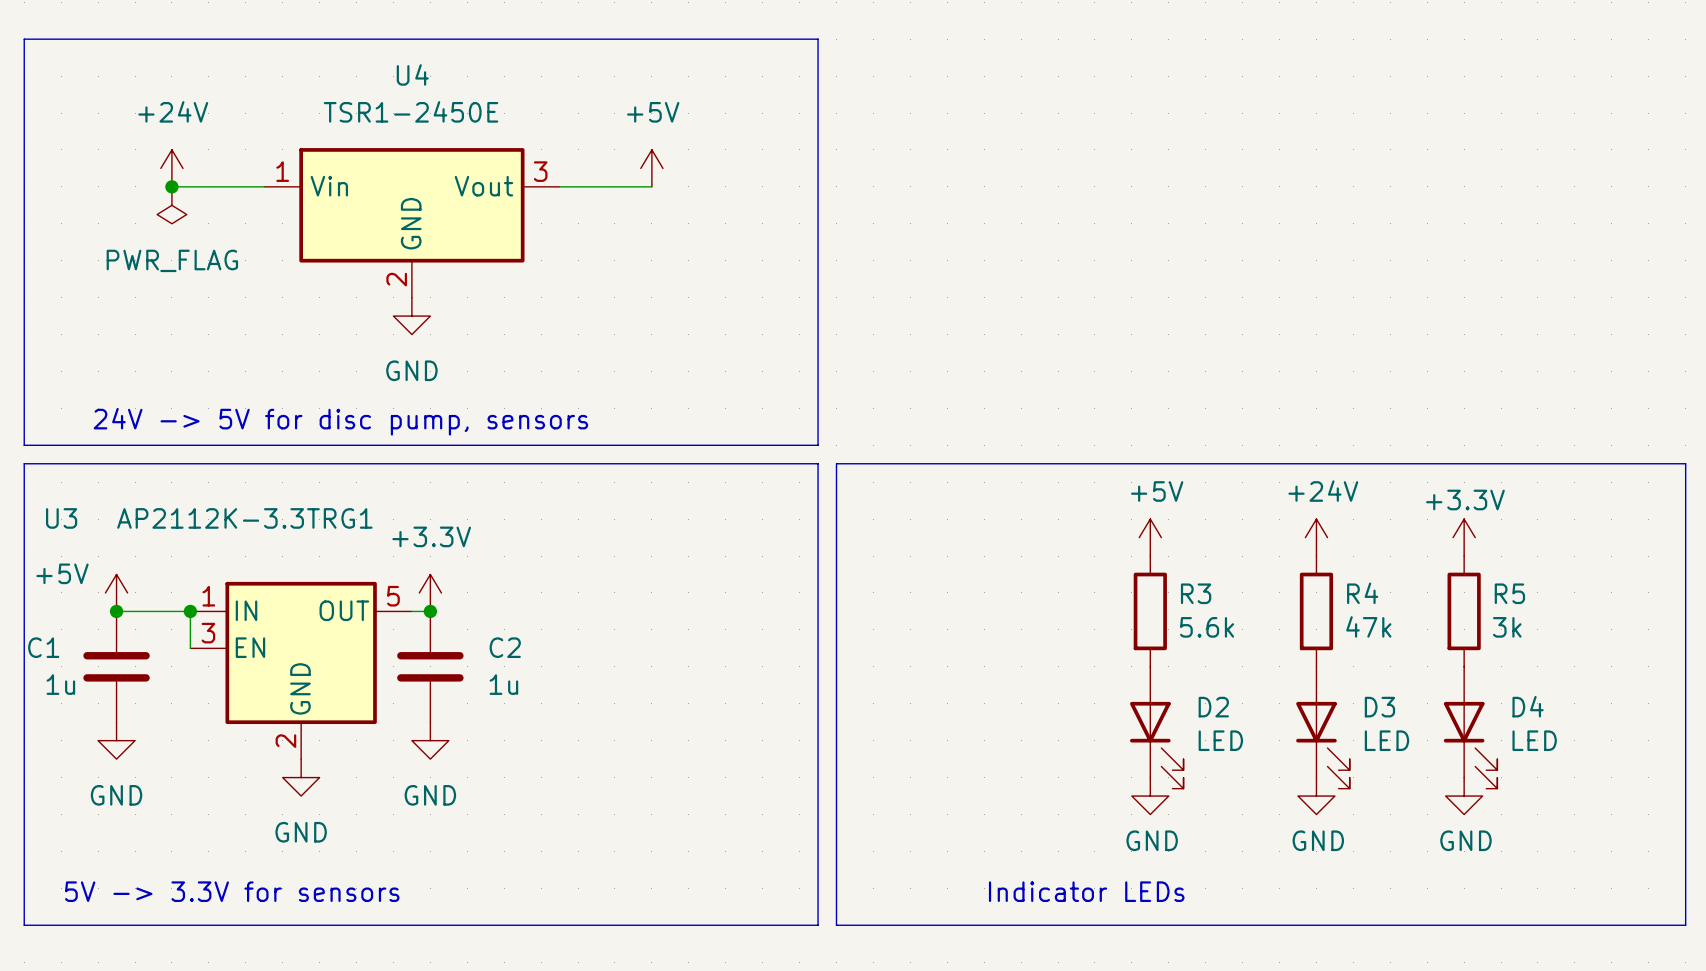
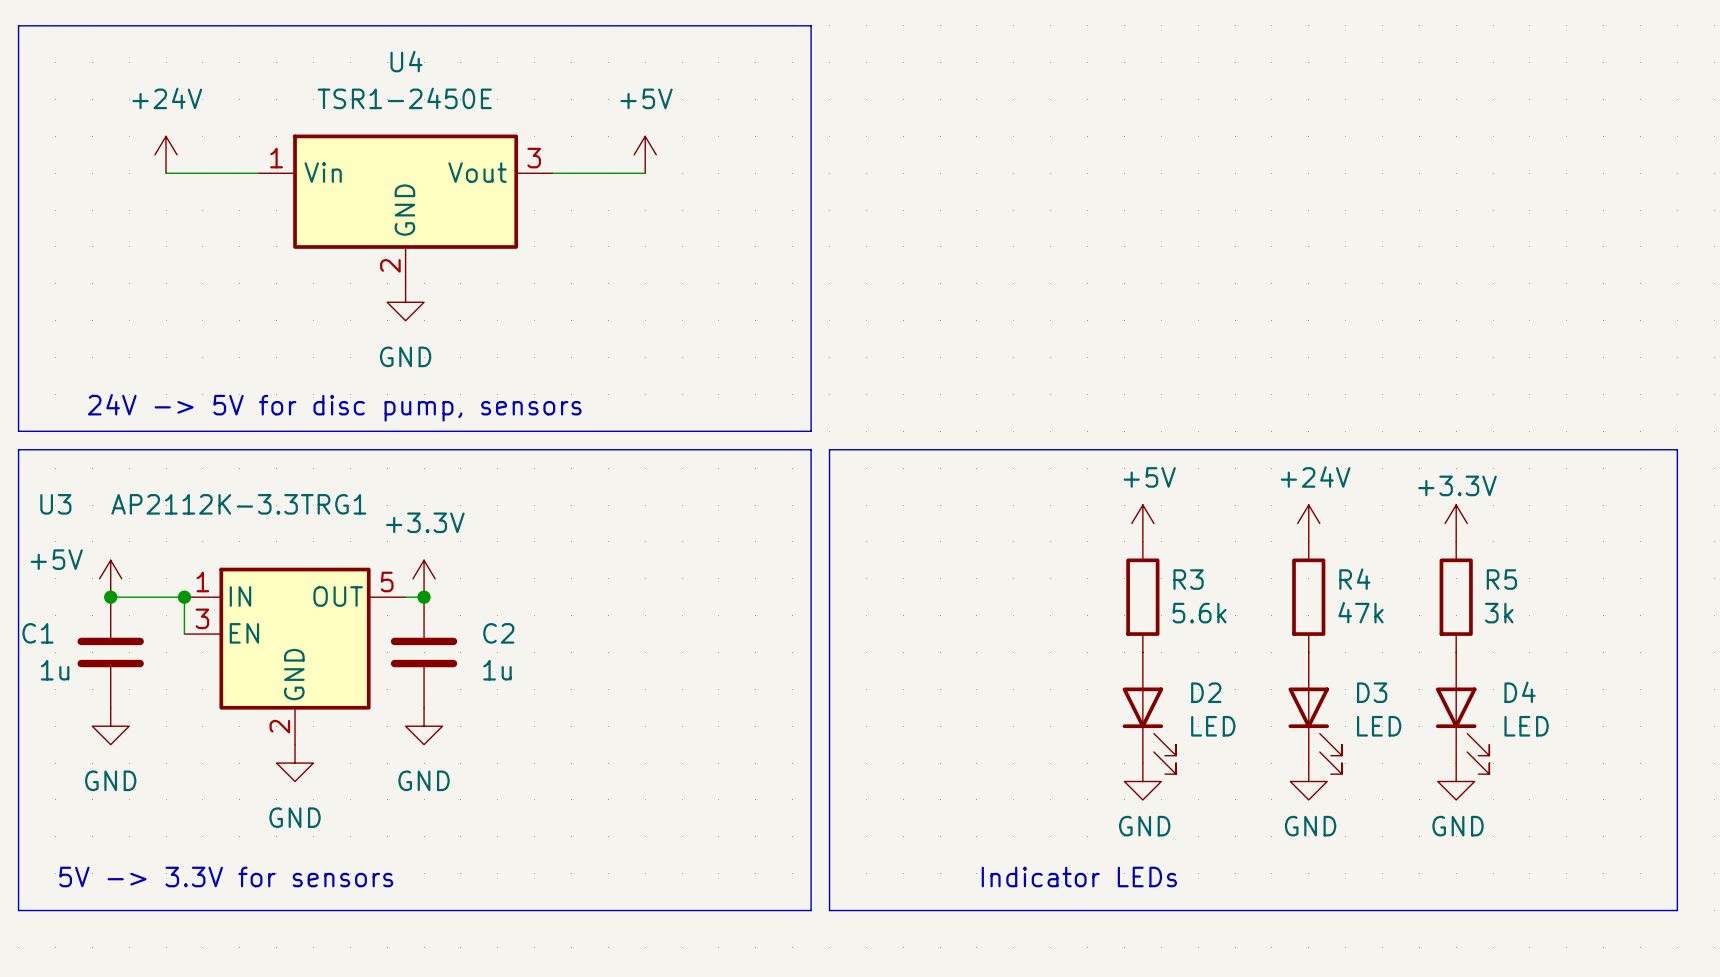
junction: (171, 186) -> none
power symbol: PWR_FLAG (171, 205) -> none

